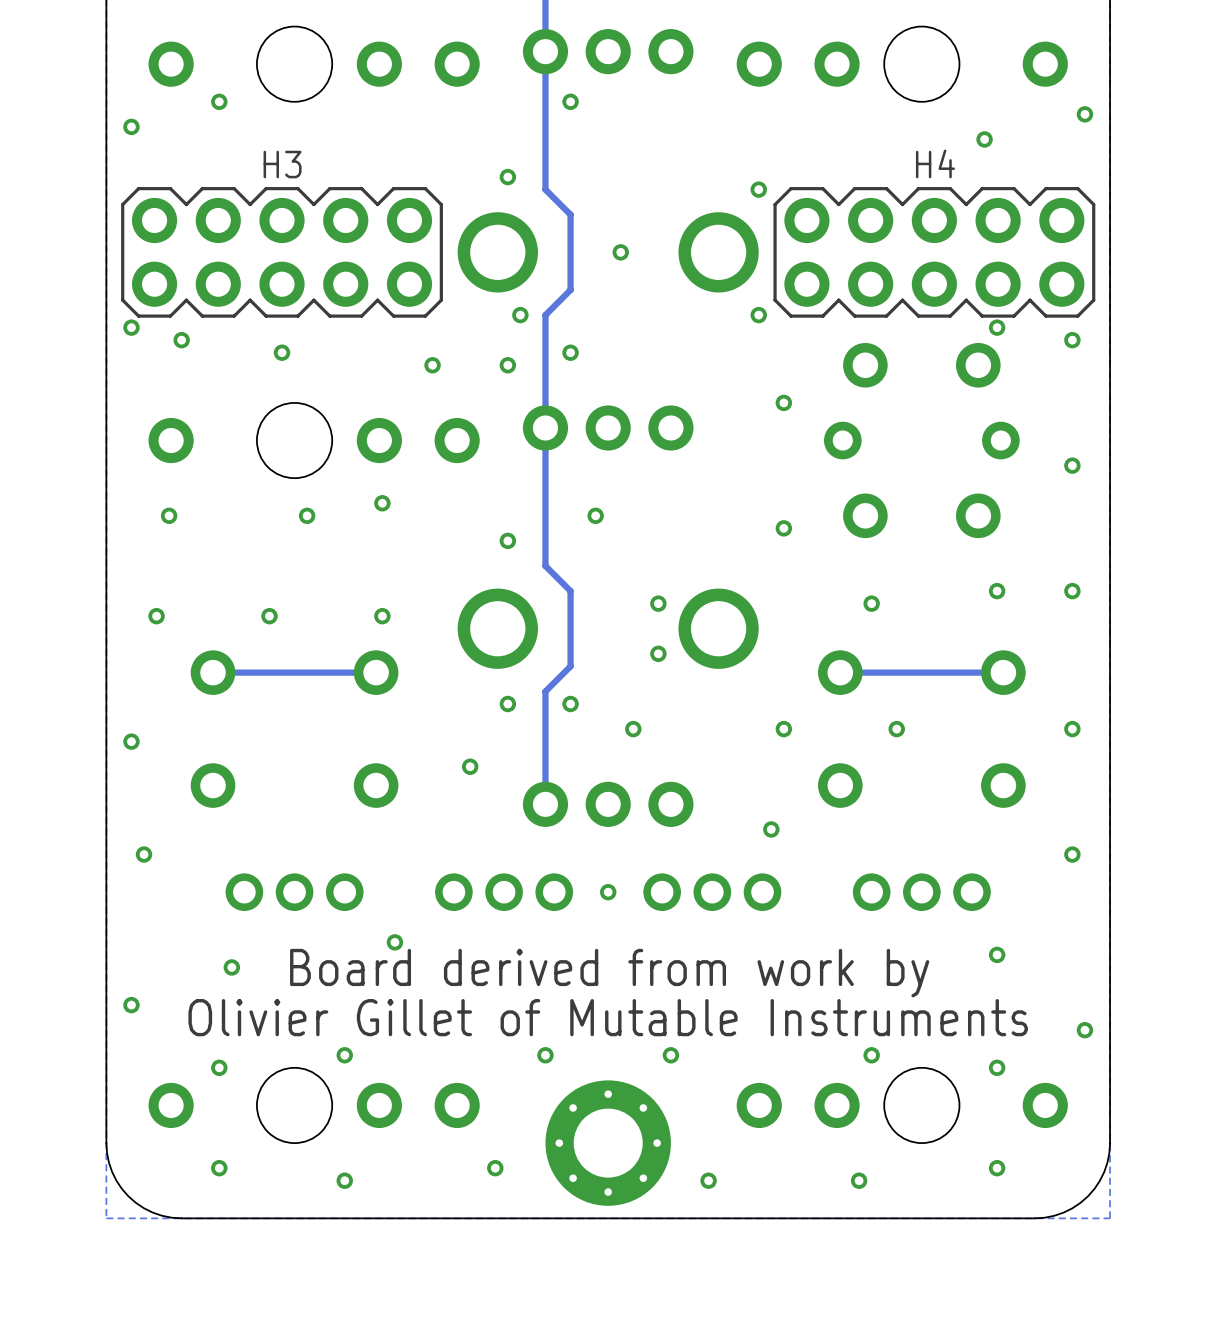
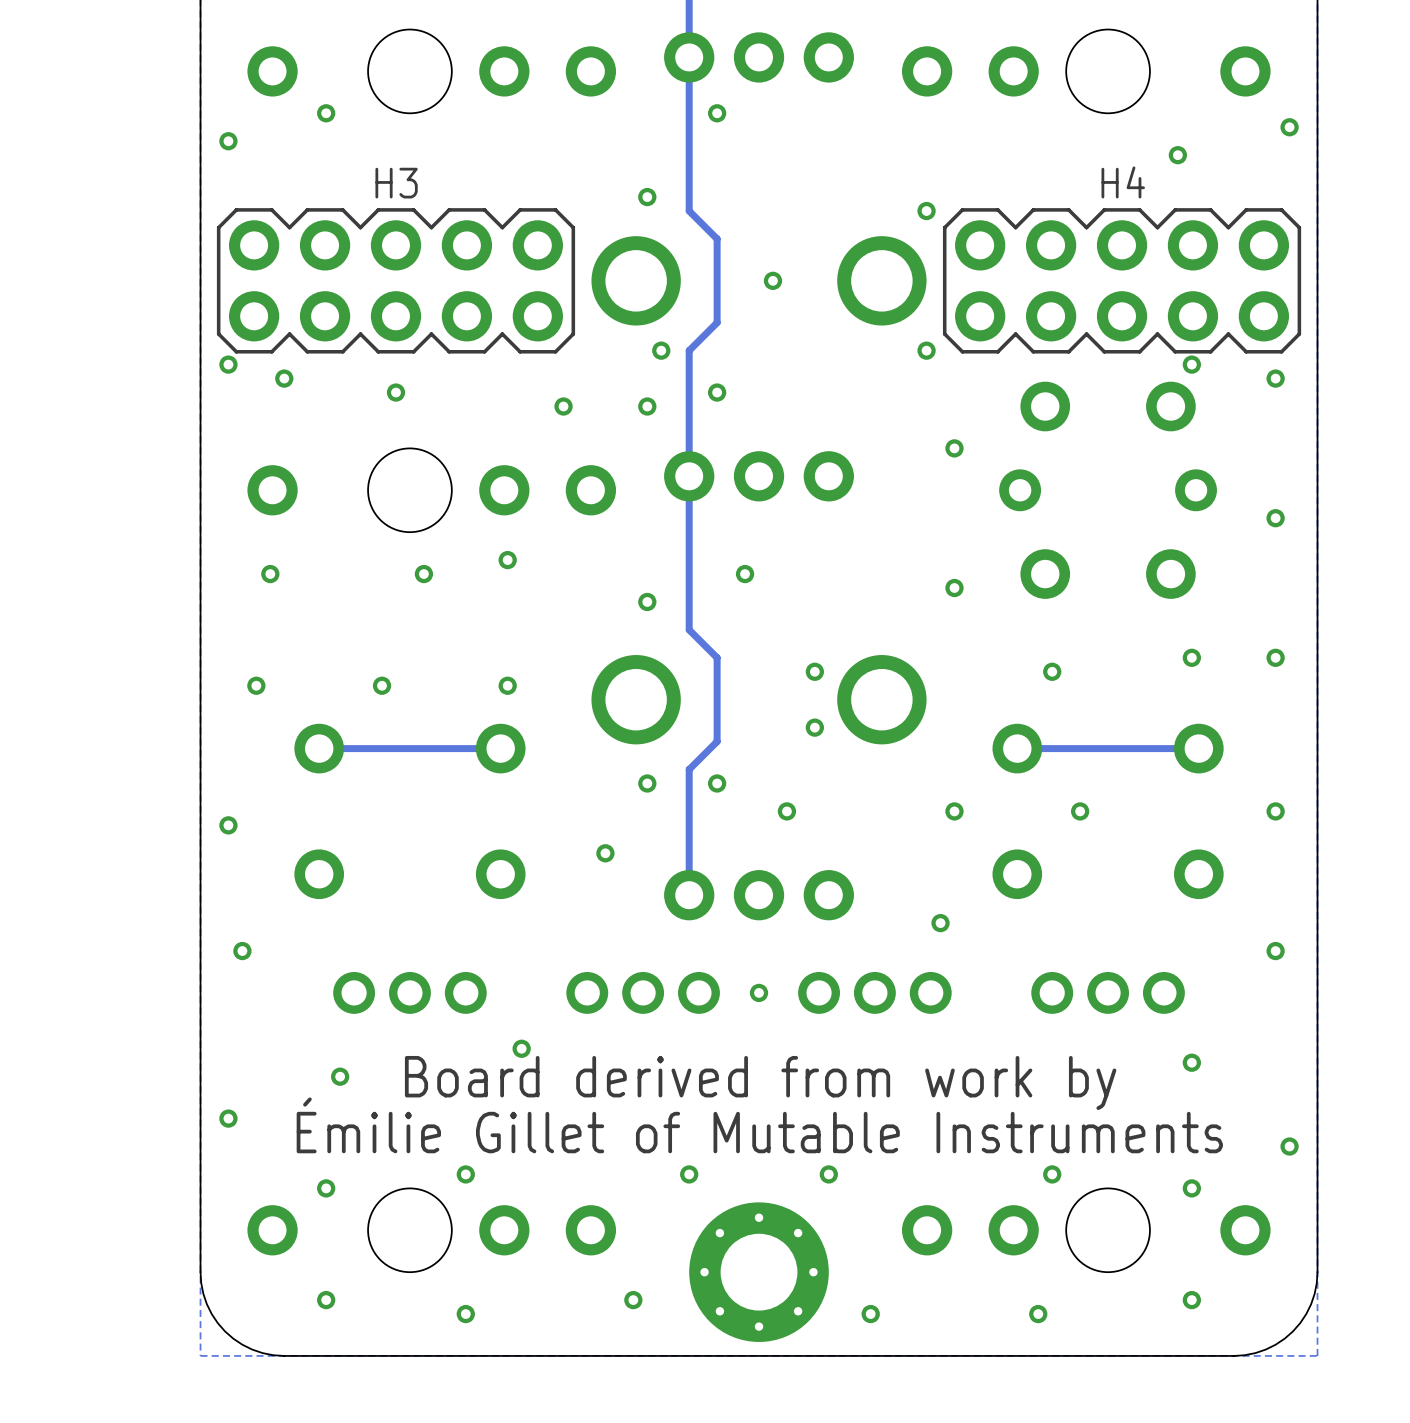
text: Olivier Gillet of Mutable Instruments (608, 1017) -> Émilie Gillet of Mutable Instruments (759, 1125)

